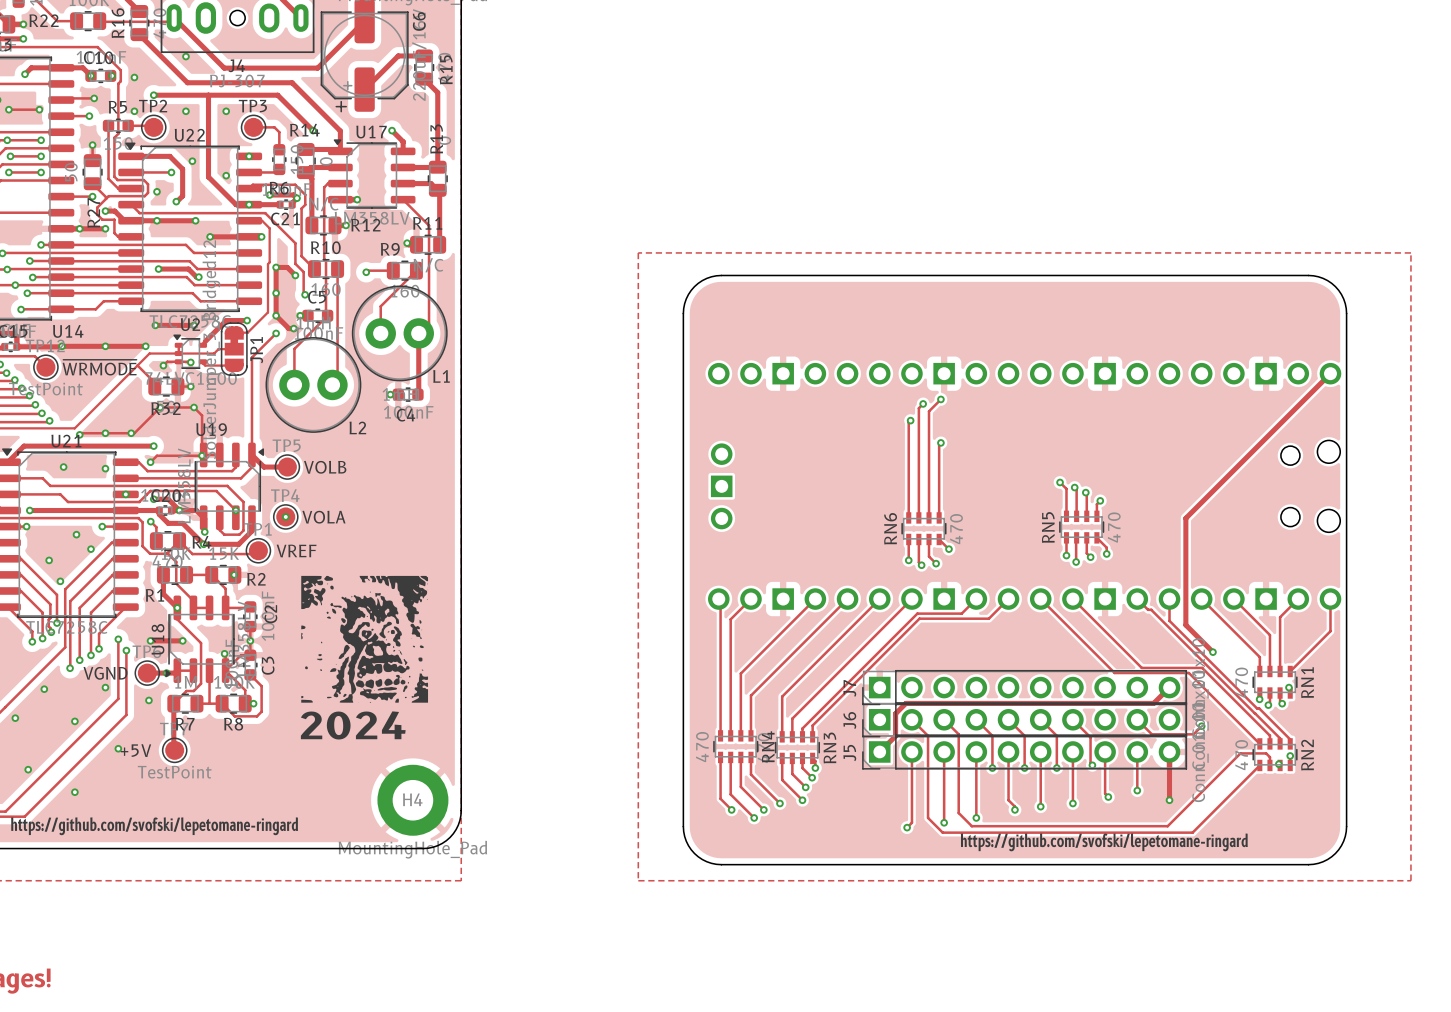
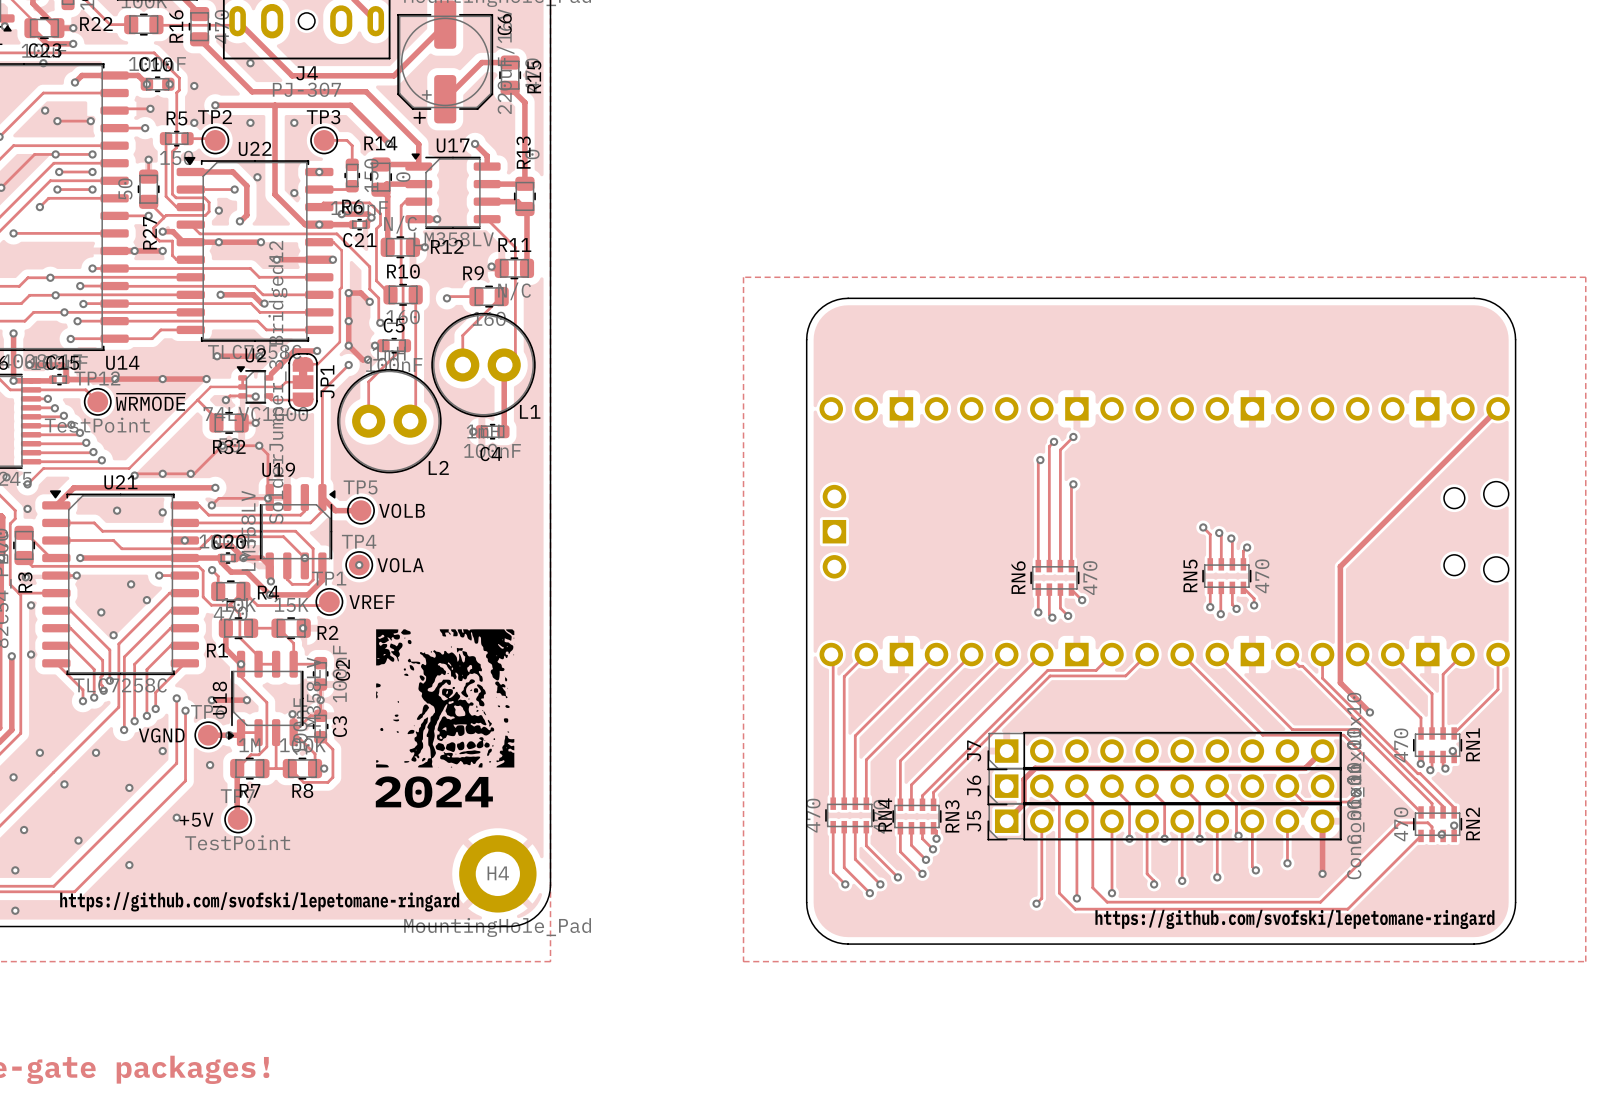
board edge: (1346, 313) (1343, 298) (1335, 286) (1323, 278) (1308, 275) (721, 275) (706, 278) (694, 286) (686, 298) (683, 313) (683, 831) (691, 849) (702, 859) (716, 864) (734, 864) -> (1515, 343) (1512, 323) (1503, 310) (1489, 301) (1474, 298) (848, 298) (832, 301) (818, 310) (809, 323) (806, 339) (806, 902) (809, 918) (818, 931) (832, 940) (848, 944)

